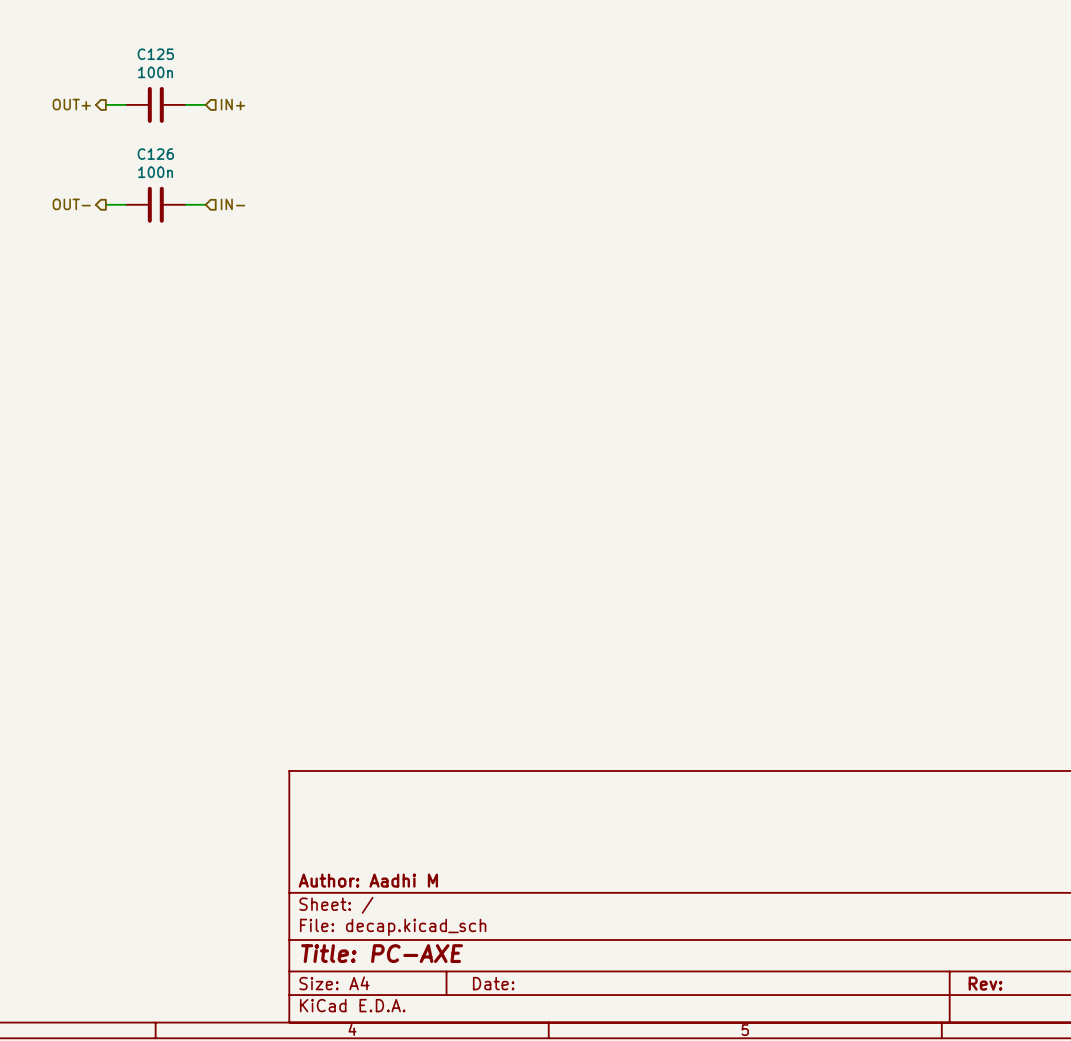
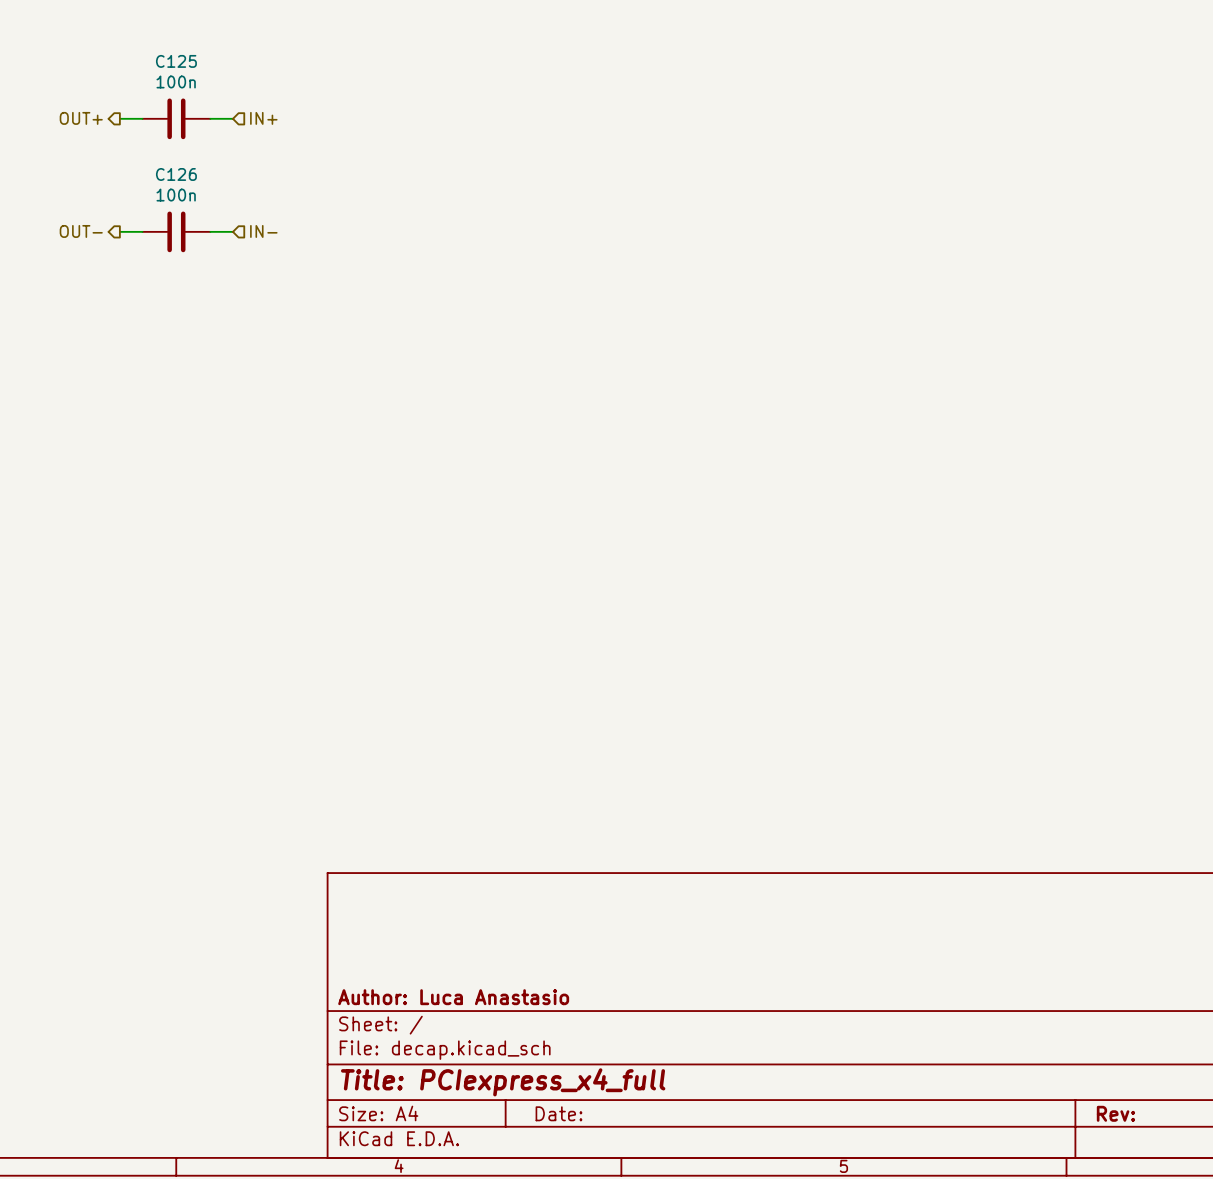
title block: Author: Aadhi M (368, 880) -> Author: Luca Anastasio (453, 997)
title block: Title: PC-AXE (382, 953) -> Title: PCIexpress_x4_full (503, 1082)

